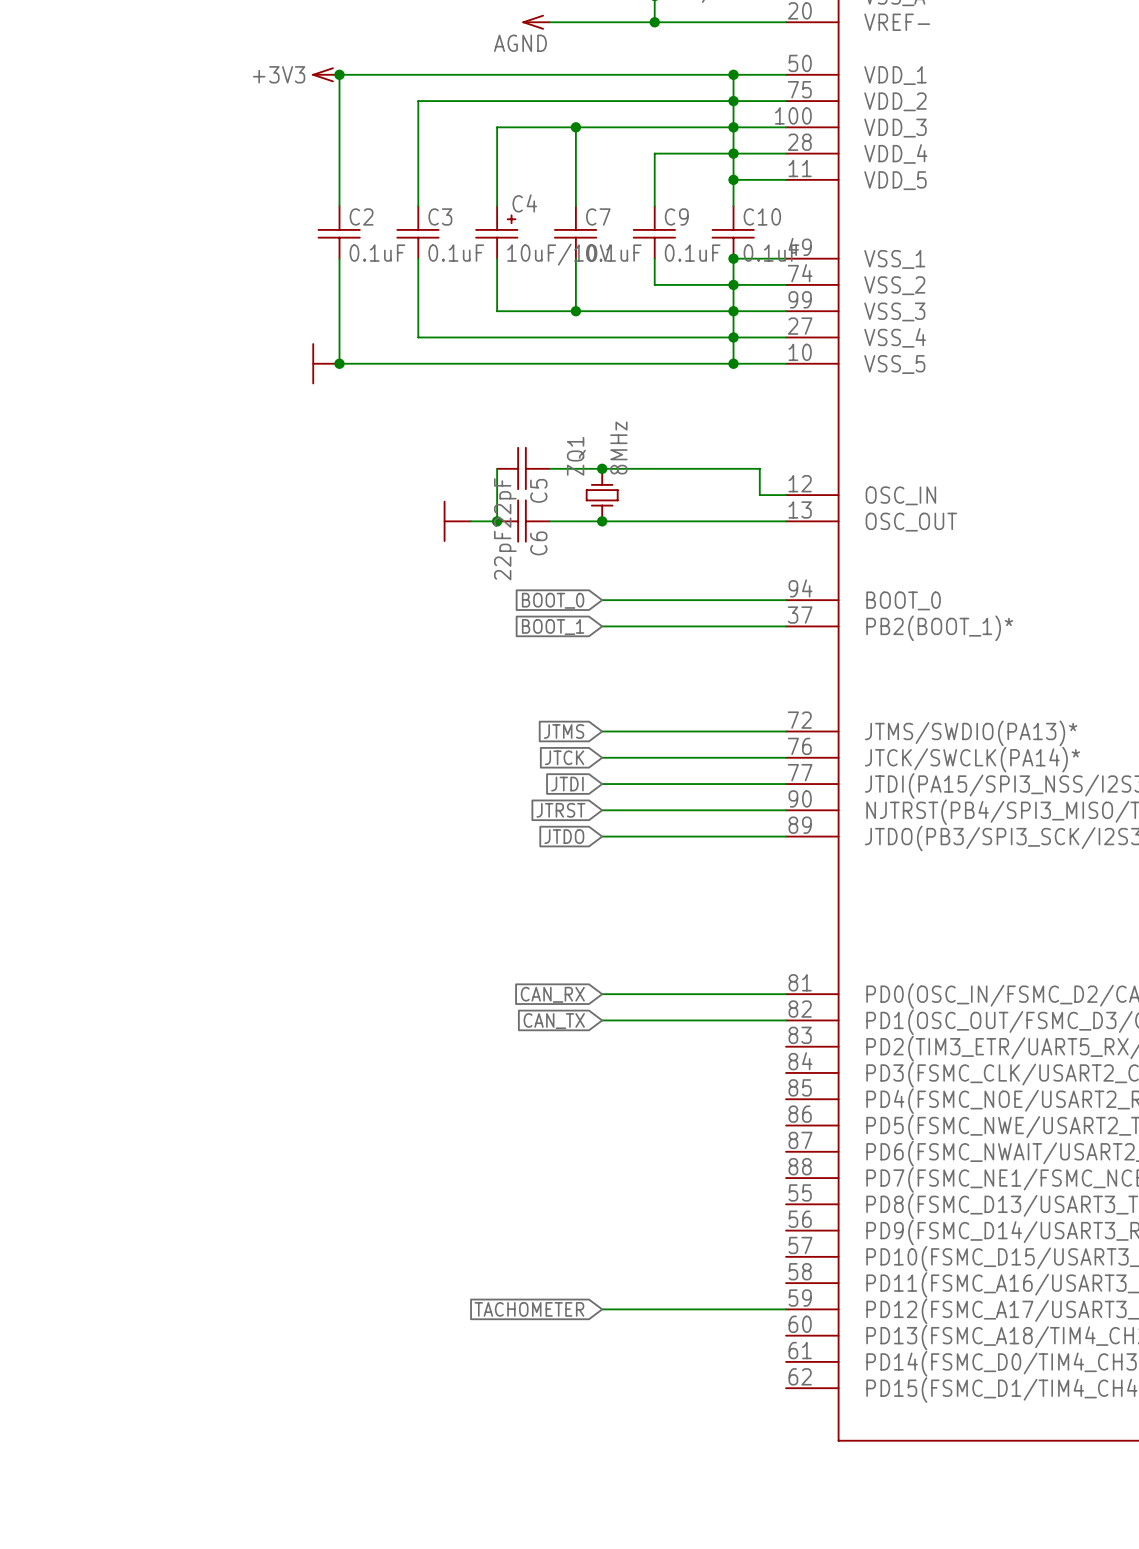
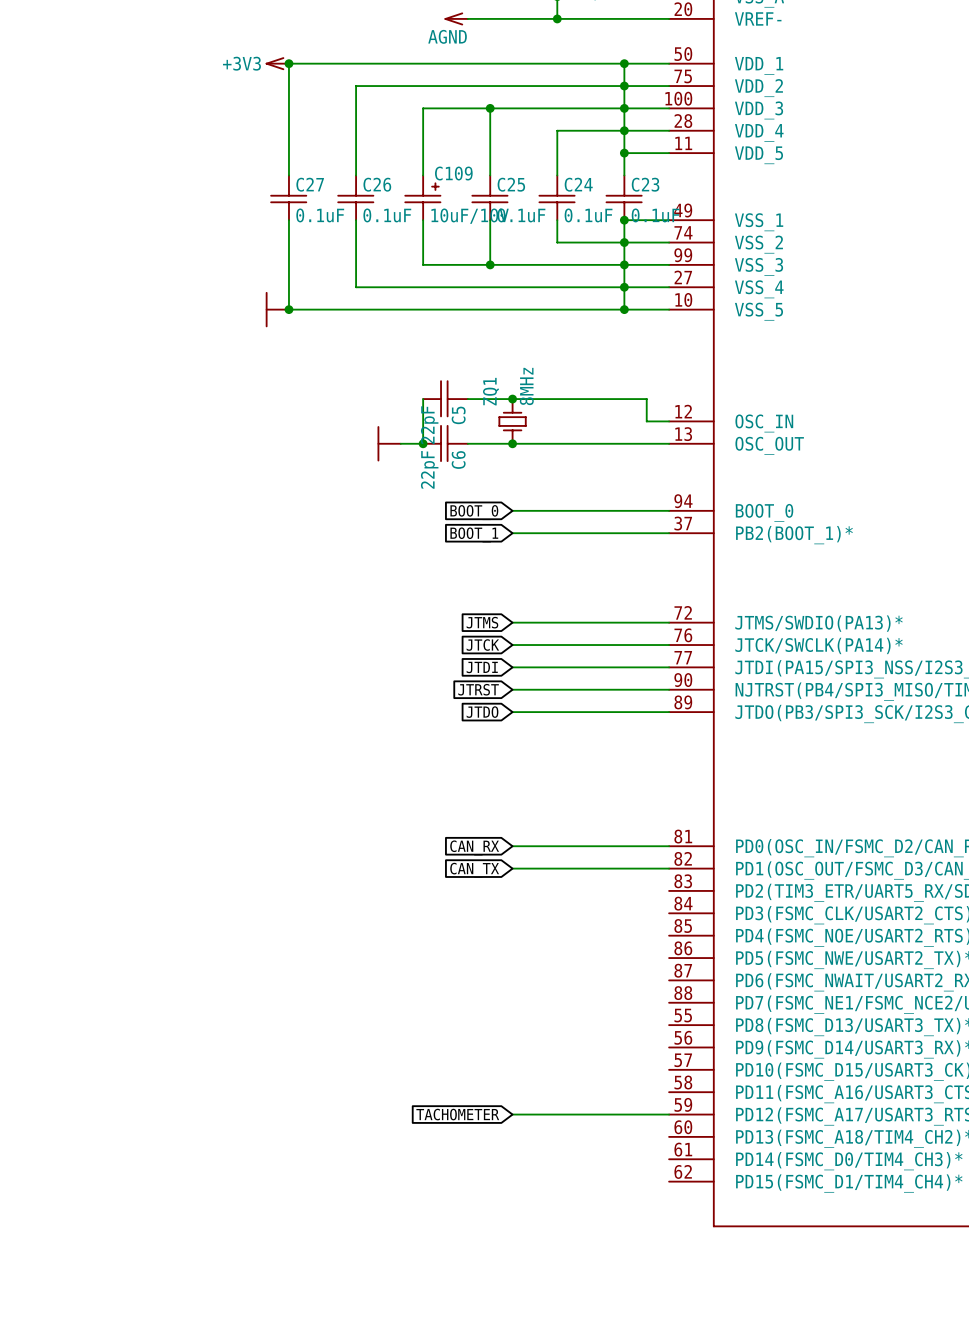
C4 name: C4 (524, 203) -> C109 (453, 173)
C2 name: C2 (361, 216) -> C27 (310, 184)
C3 name: C3 (440, 216) -> C26 (377, 184)
C7 name: C7 (598, 216) -> C25 (511, 184)
C9 name: C9 (676, 216) -> C24 (578, 184)
C10 name: C10 (762, 216) -> C23 (645, 184)

